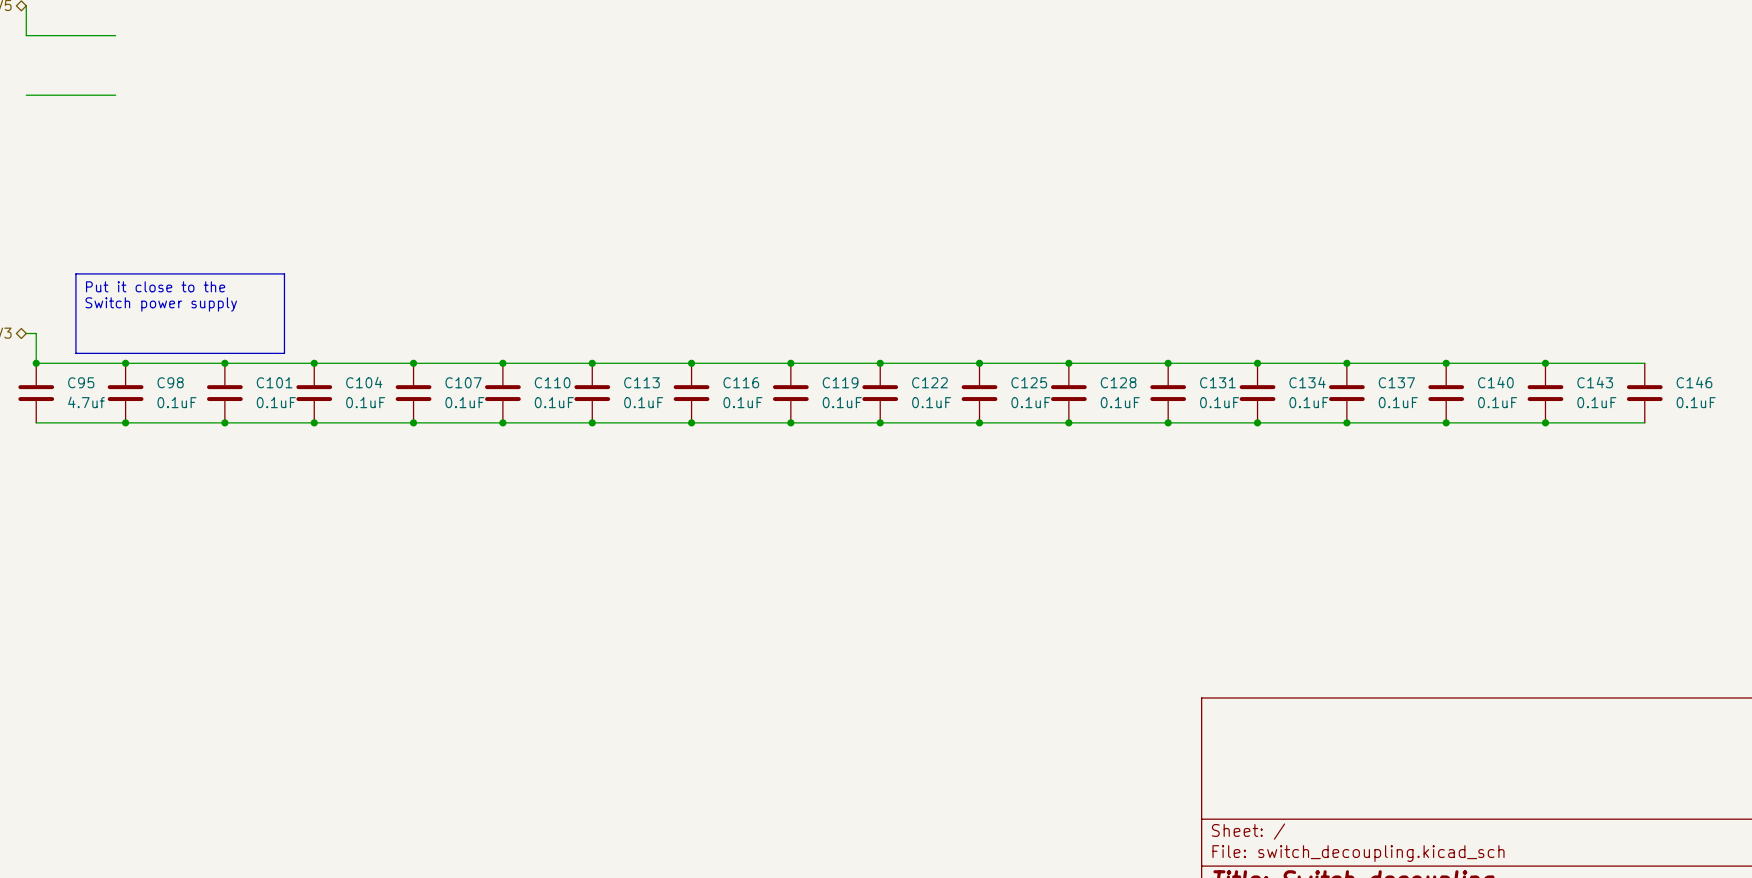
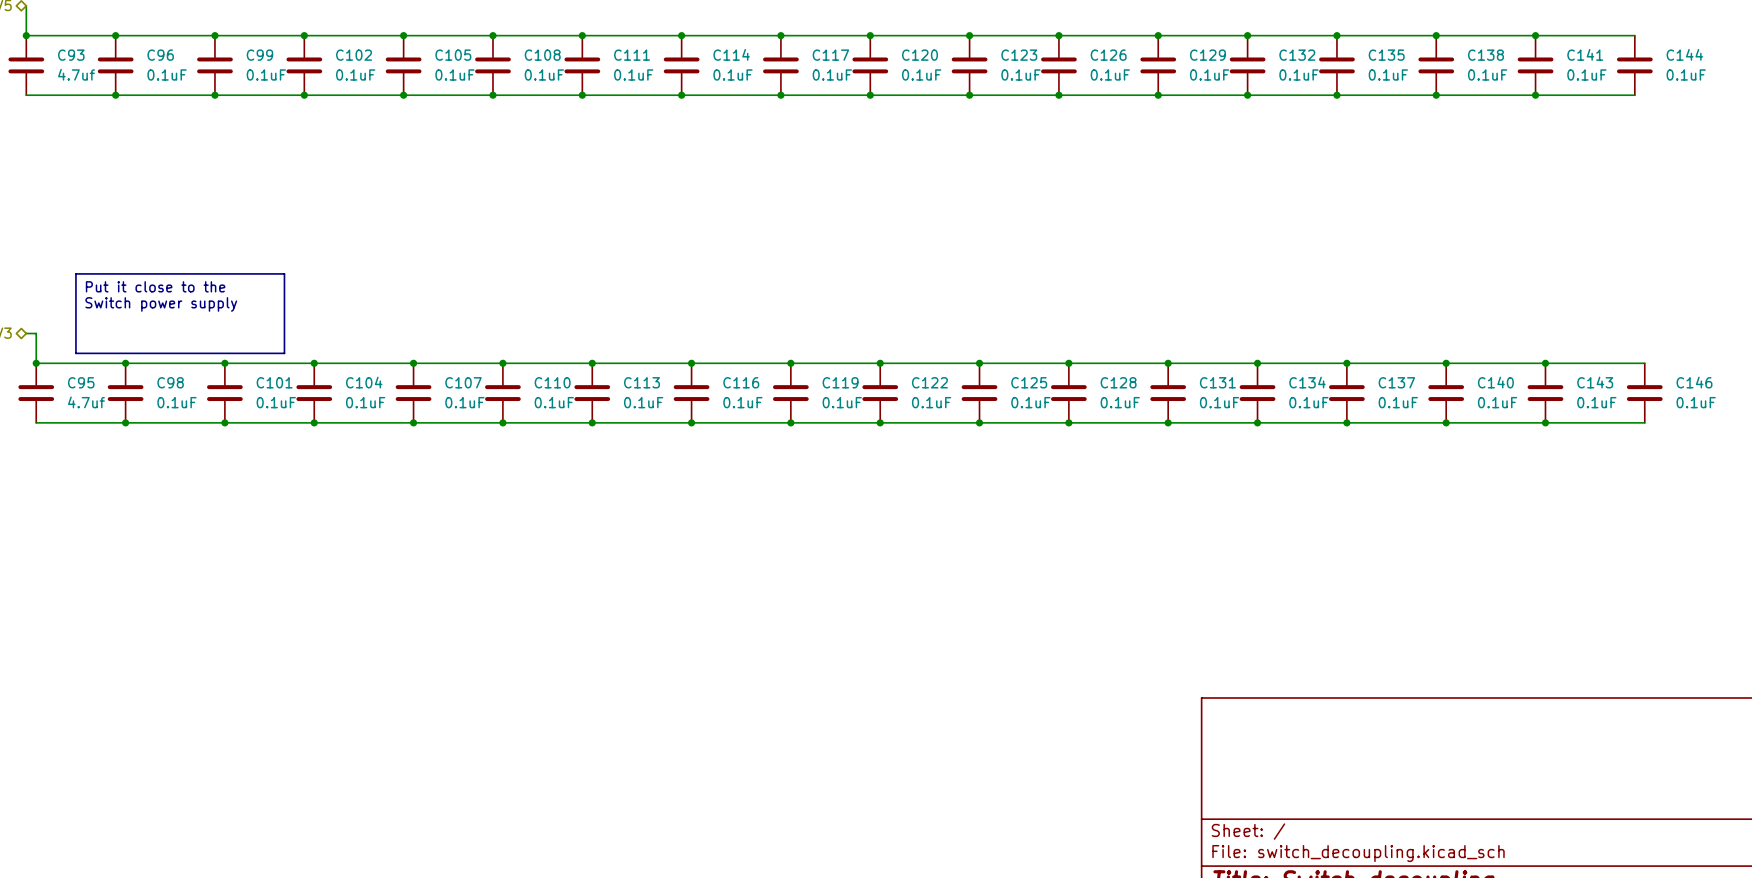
junction: none -> (26, 35)
wire: none -> (115, 35) (1634, 35)
junction: none -> (115, 35)
junction: none -> (214, 35)
junction: none -> (304, 35)
junction: none -> (403, 35)
junction: none -> (492, 35)
junction: none -> (582, 35)
junction: none -> (681, 35)
junction: none -> (780, 35)
junction: none -> (870, 35)
junction: none -> (969, 35)
junction: none -> (1058, 35)
junction: none -> (1158, 35)
junction: none -> (1247, 35)
junction: none -> (1336, 35)
junction: none -> (1436, 35)
junction: none -> (1535, 35)
C93: none -> 4.7uf (26, 65)
C96: none -> 0.1uF (115, 65)
C99: none -> 0.1uF (214, 65)
C102: none -> 0.1uF (304, 65)
C105: none -> 0.1uF (403, 65)
C108: none -> 0.1uF (492, 65)
C111: none -> 0.1uF (582, 65)
C114: none -> 0.1uF (681, 65)
C117: none -> 0.1uF (780, 65)
C120: none -> 0.1uF (870, 65)
C123: none -> 0.1uF (969, 65)
C126: none -> 0.1uF (1058, 65)
C129: none -> 0.1uF (1158, 65)
C132: none -> 0.1uF (1247, 65)
C135: none -> 0.1uF (1336, 65)
C138: none -> 0.1uF (1436, 65)
C141: none -> 0.1uF (1535, 65)
C144: none -> 0.1uF (1634, 65)
wire: none -> (115, 95) (1634, 95)
junction: none -> (115, 95)
junction: none -> (214, 95)
junction: none -> (304, 95)
junction: none -> (403, 95)
junction: none -> (492, 95)
junction: none -> (582, 95)
junction: none -> (681, 95)
junction: none -> (780, 95)
junction: none -> (870, 95)
junction: none -> (969, 95)
junction: none -> (1058, 95)
junction: none -> (1158, 95)
junction: none -> (1247, 95)
junction: none -> (1336, 95)
junction: none -> (1436, 95)
junction: none -> (1535, 95)

